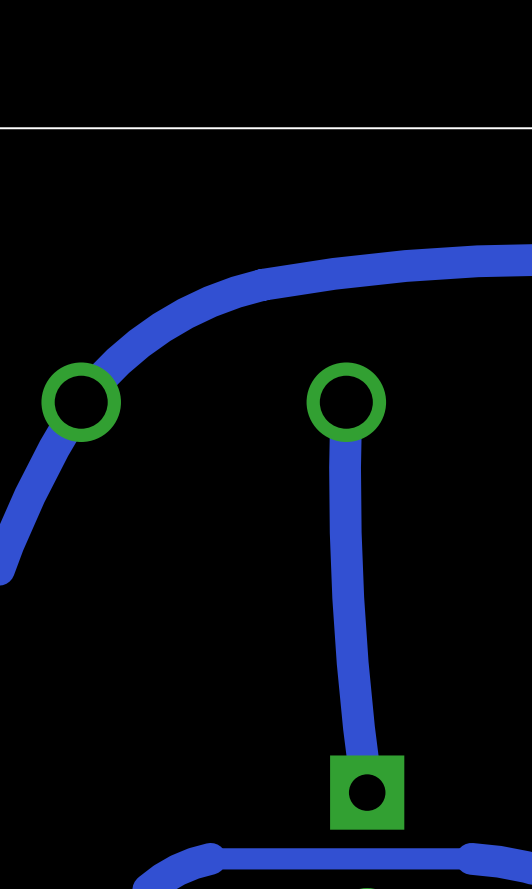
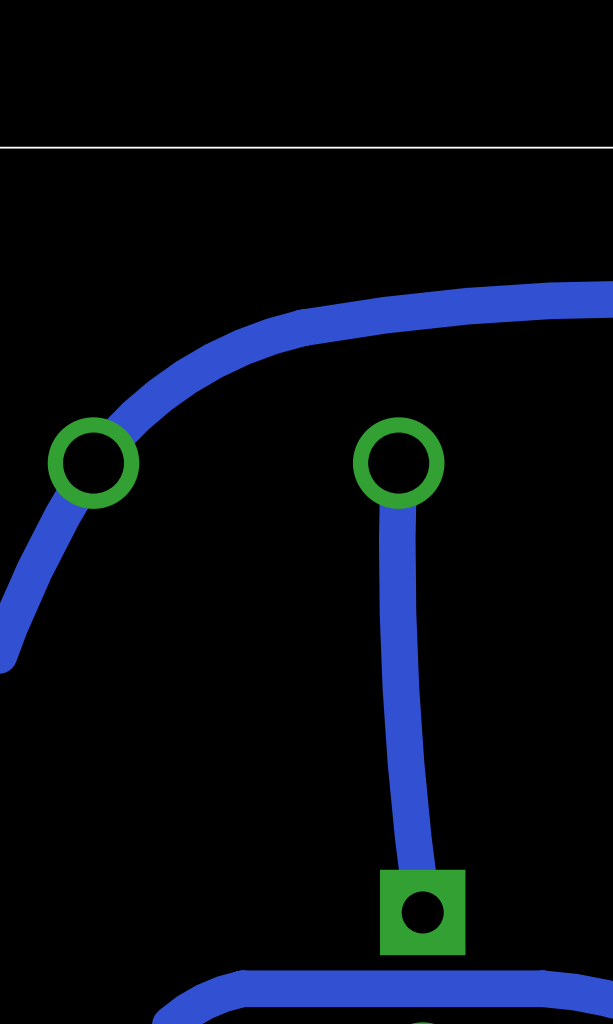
track width: thin (471, 858) (210, 858) -> thick (542, 988) (242, 988)

